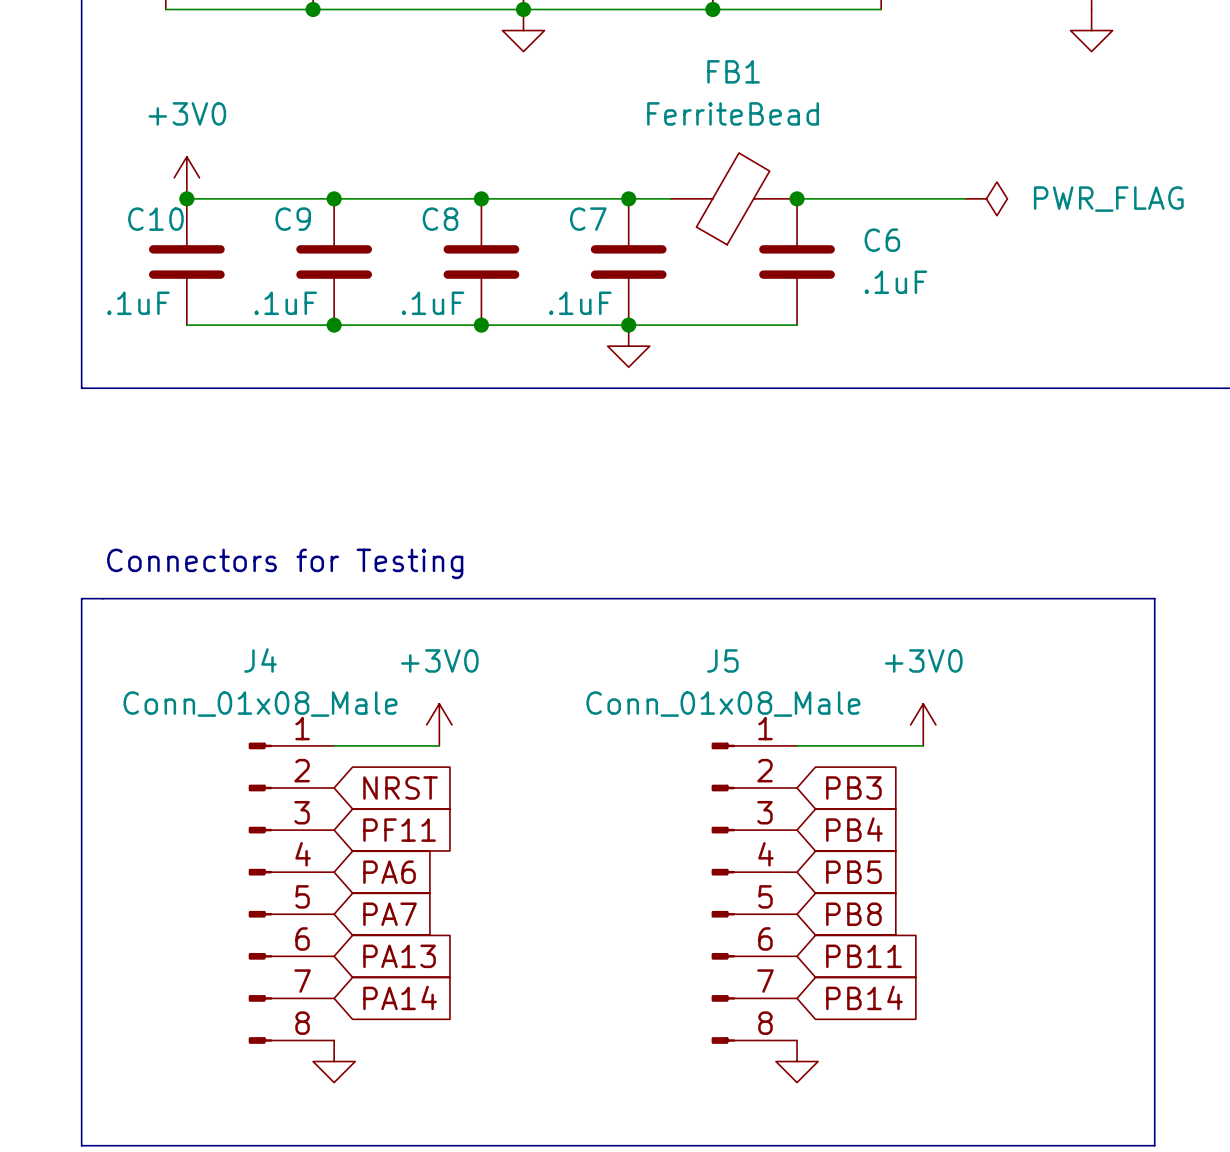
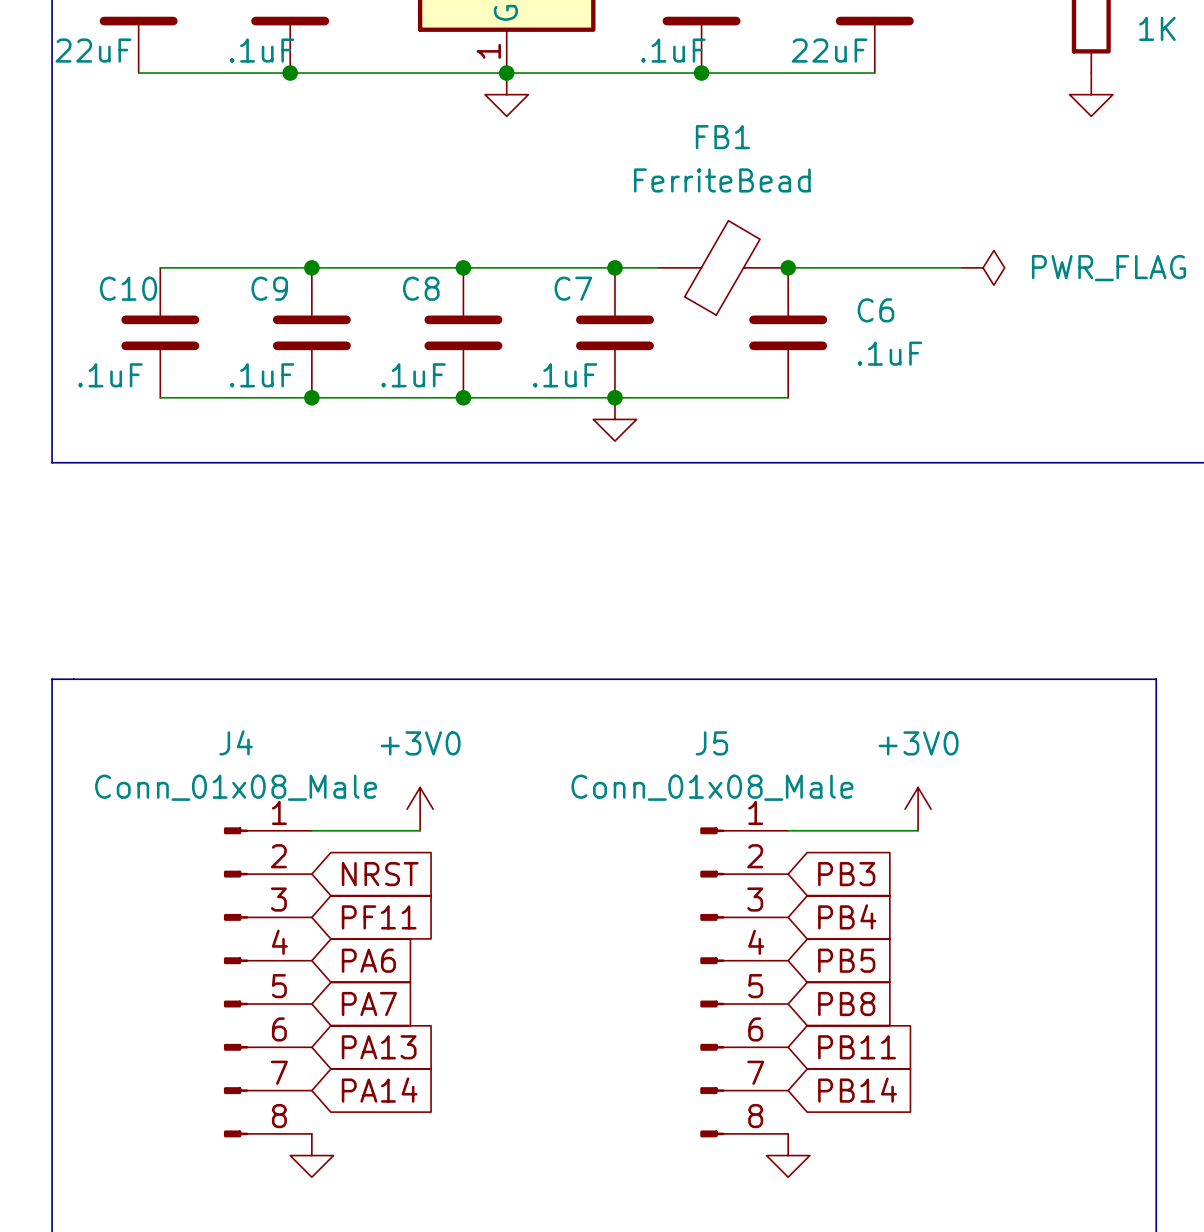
power symbol: +3V0 (186, 177) -> none
junction: (186, 198) -> none
text: Connectors for Testing (285, 563) -> none

